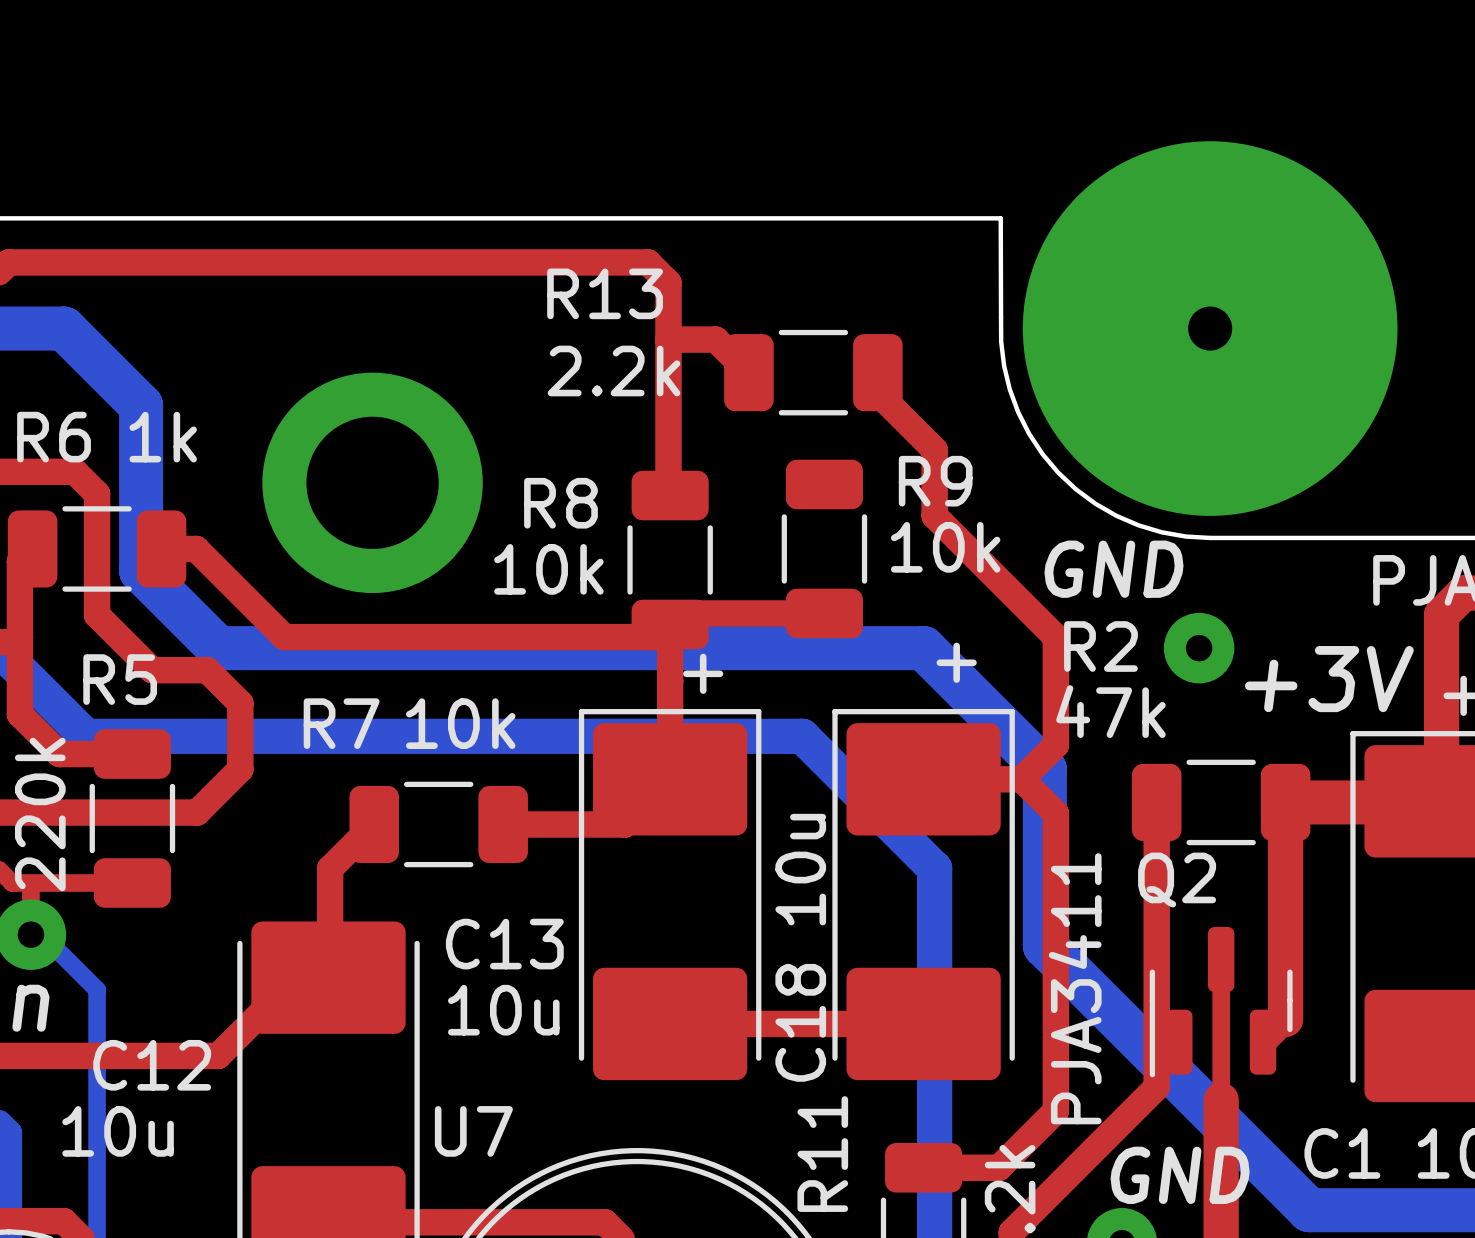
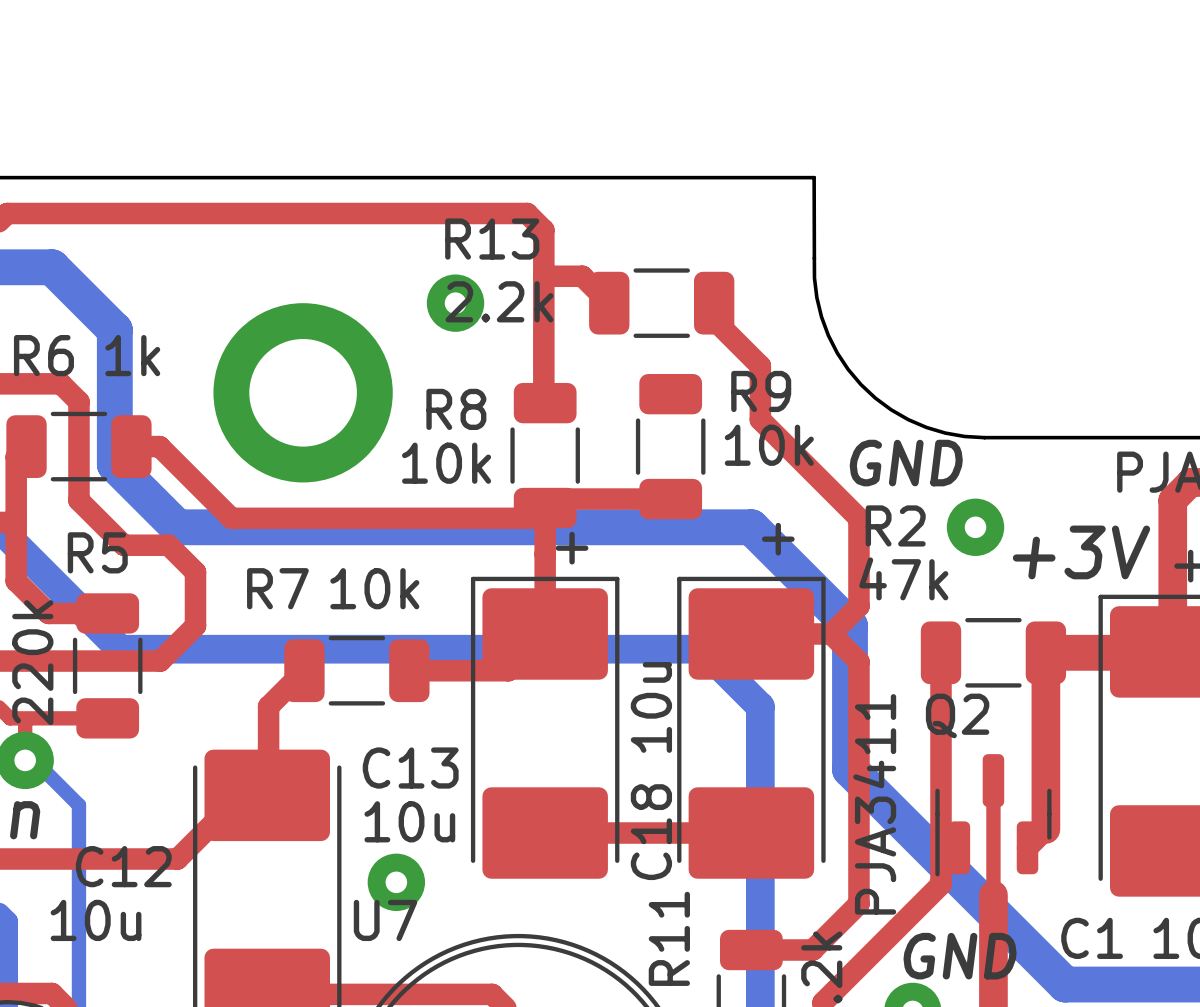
via: (1210, 328) -> none
via: none -> (455, 303)
bottom track: (86, 736) (802, 736) (864, 798) -> (70, 599) (120, 649) (702, 649)
via: none -> (396, 882)

